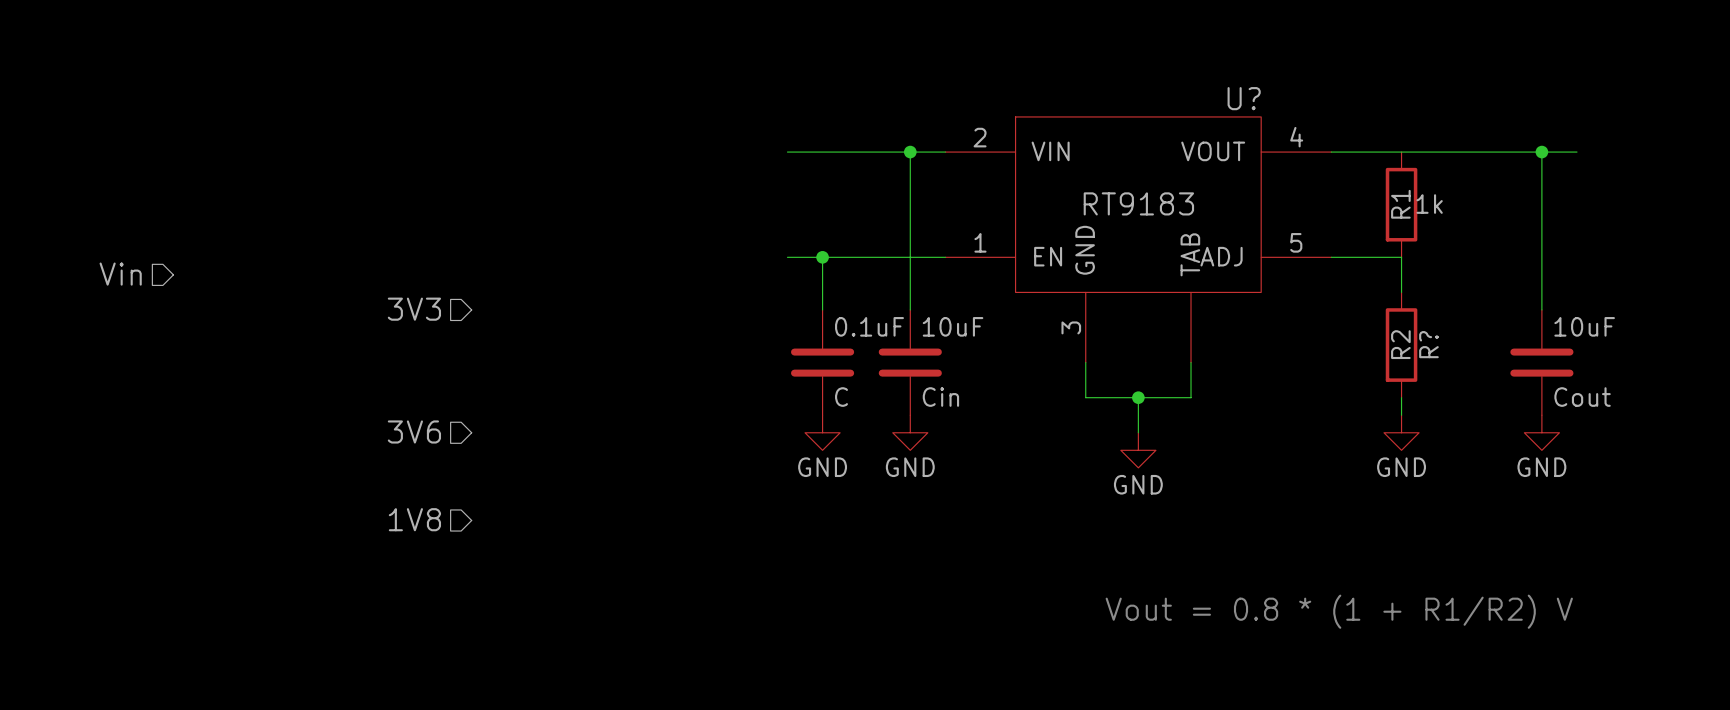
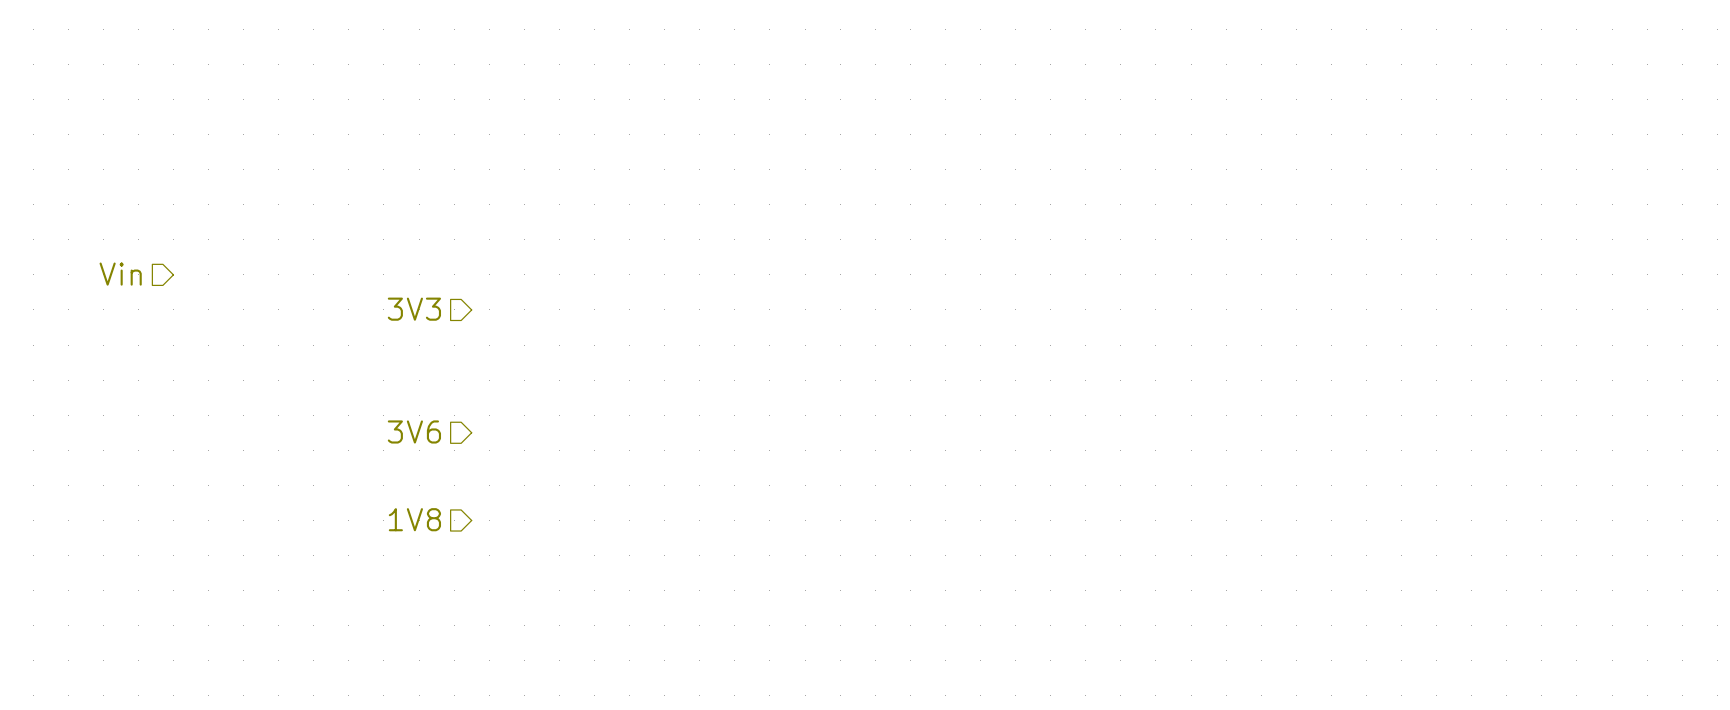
wire: (787, 152) (945, 152) -> none
wire: (910, 152) (910, 309) -> none
junction: (910, 152) -> none
wire: (1331, 152) (1576, 152) -> none
wire: (1541, 152) (1541, 309) -> none
junction: (1541, 152) -> none
1k: R1 (1401, 204) -> none
U?: RT9183 (1138, 239) -> none
wire: (787, 257) (945, 257) -> none
wire: (822, 257) (822, 309) -> none
junction: (822, 257) -> none
wire: (1331, 257) (1401, 257) (1401, 292) -> none
R?: R2 (1401, 345) -> none
0.1uF: C (822, 362) -> none
10uF: Cin (910, 362) -> none
wire: (1085, 362) (1085, 397) (1191, 397) (1191, 362) -> none
10uF: Cout (1541, 362) -> none
wire: (1138, 397) (1138, 432) -> none
junction: (1138, 397) -> none
wire: (1401, 397) (1401, 415) -> none
power symbol: GND (822, 432) -> none
power symbol: GND (910, 432) -> none
power symbol: GND (1401, 432) -> none
power symbol: GND (1541, 432) -> none
power symbol: GND (1138, 450) -> none
text: Vout = 0.8 * (1 + R1/R2) V (1339, 611) -> none

